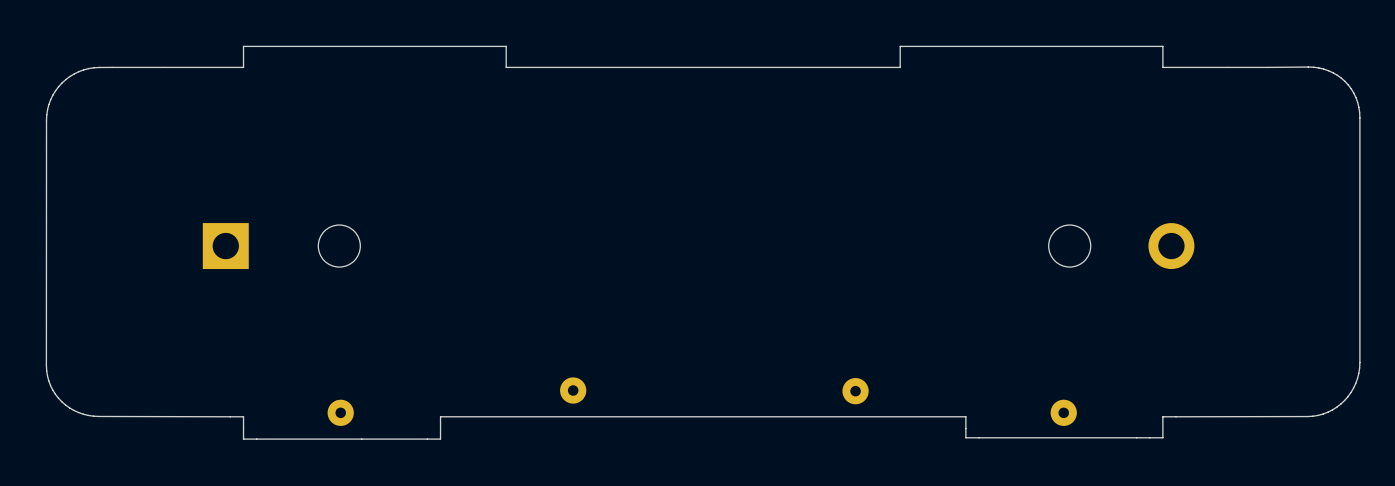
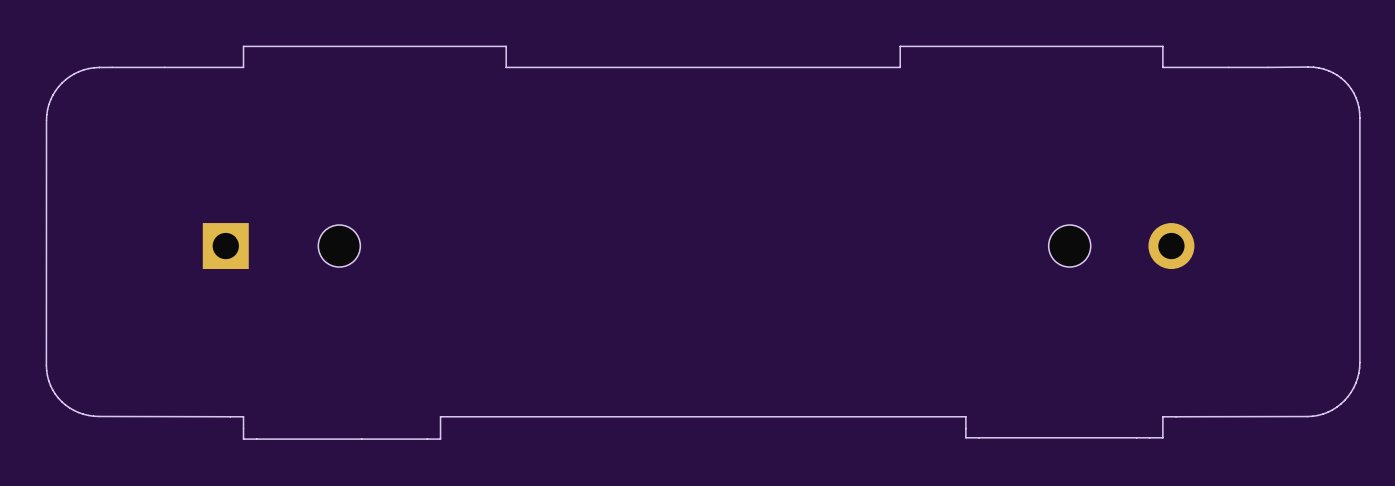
part: (573, 390) -> none
part: (855, 391) -> none
part: (340, 412) -> none
part: (1063, 412) -> none

